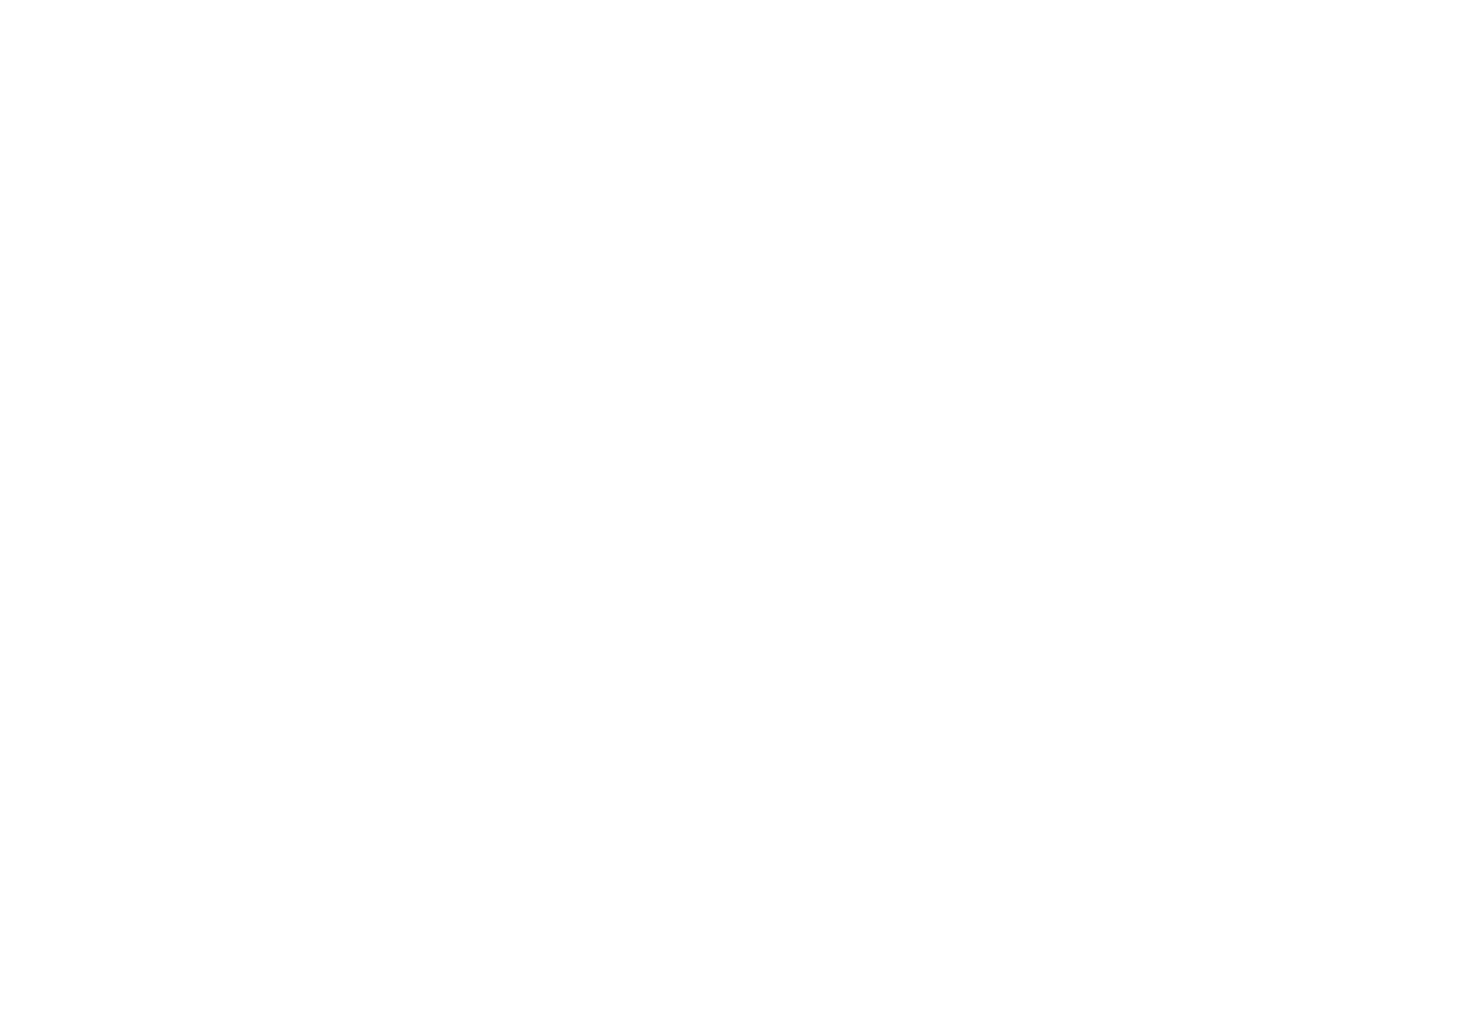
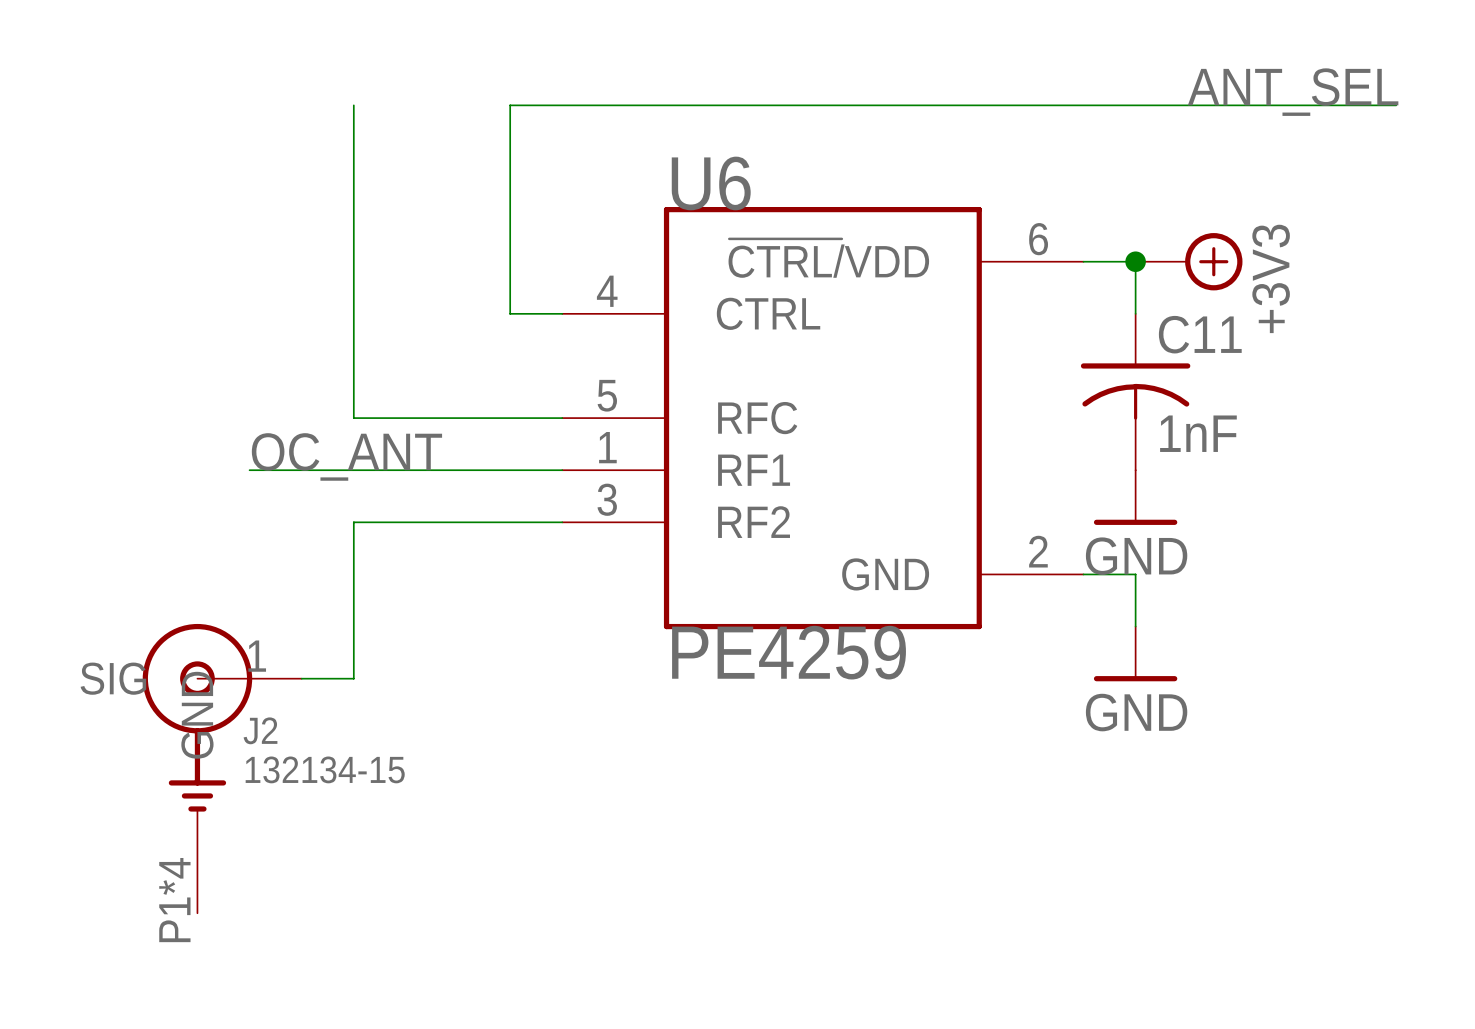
label: none -> ANT_SEL (1293, 92)
wire: none -> (353, 105) (353, 418) (562, 418)
wire: none -> (1396, 105) (510, 105) (510, 313) (562, 313)
wire: none -> (1083, 261) (1135, 261) (1135, 313)
junction: none -> (1135, 261)
power symbol: none -> +3V3 (1189, 261)
C11: none -> 1nF (1135, 392)
U6: none -> PE4259 (822, 418)
label: none -> OC_ANT (346, 456)
wire: none -> (249, 470) (562, 470)
power symbol: none -> GND (1135, 497)
wire: none -> (562, 522) (353, 522) (353, 678) (301, 678)
wire: none -> (1083, 574) (1135, 574) (1135, 626)
power symbol: none -> GND (1135, 653)
J2: none -> 132134-15 (222, 768)

